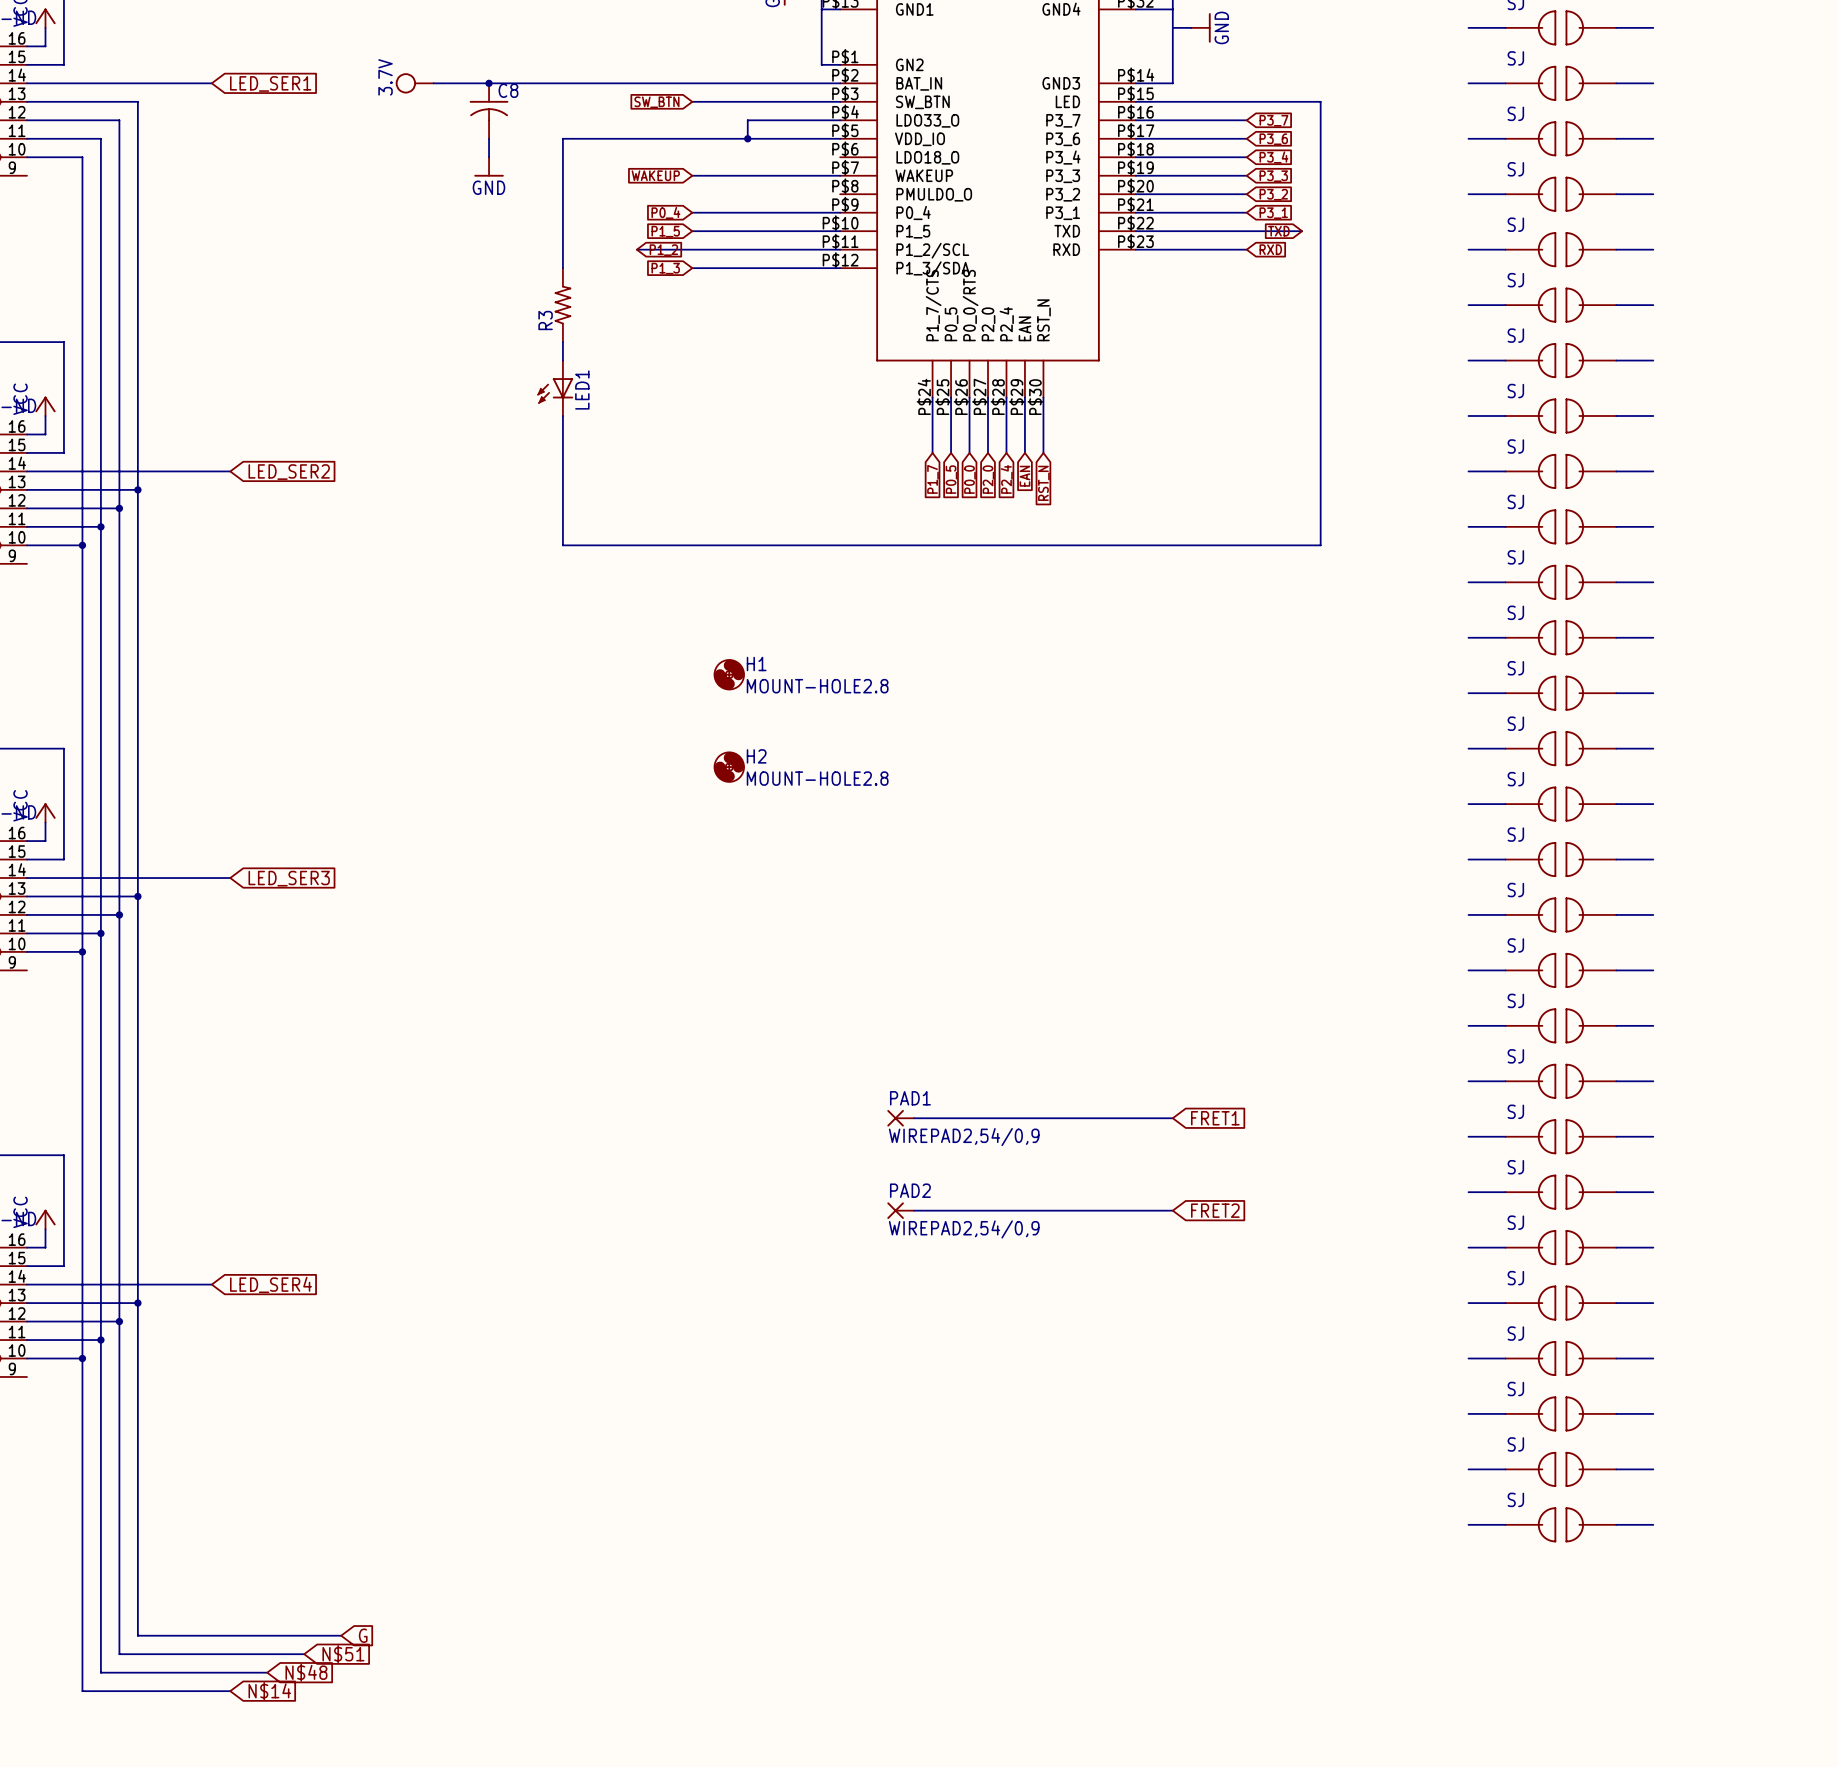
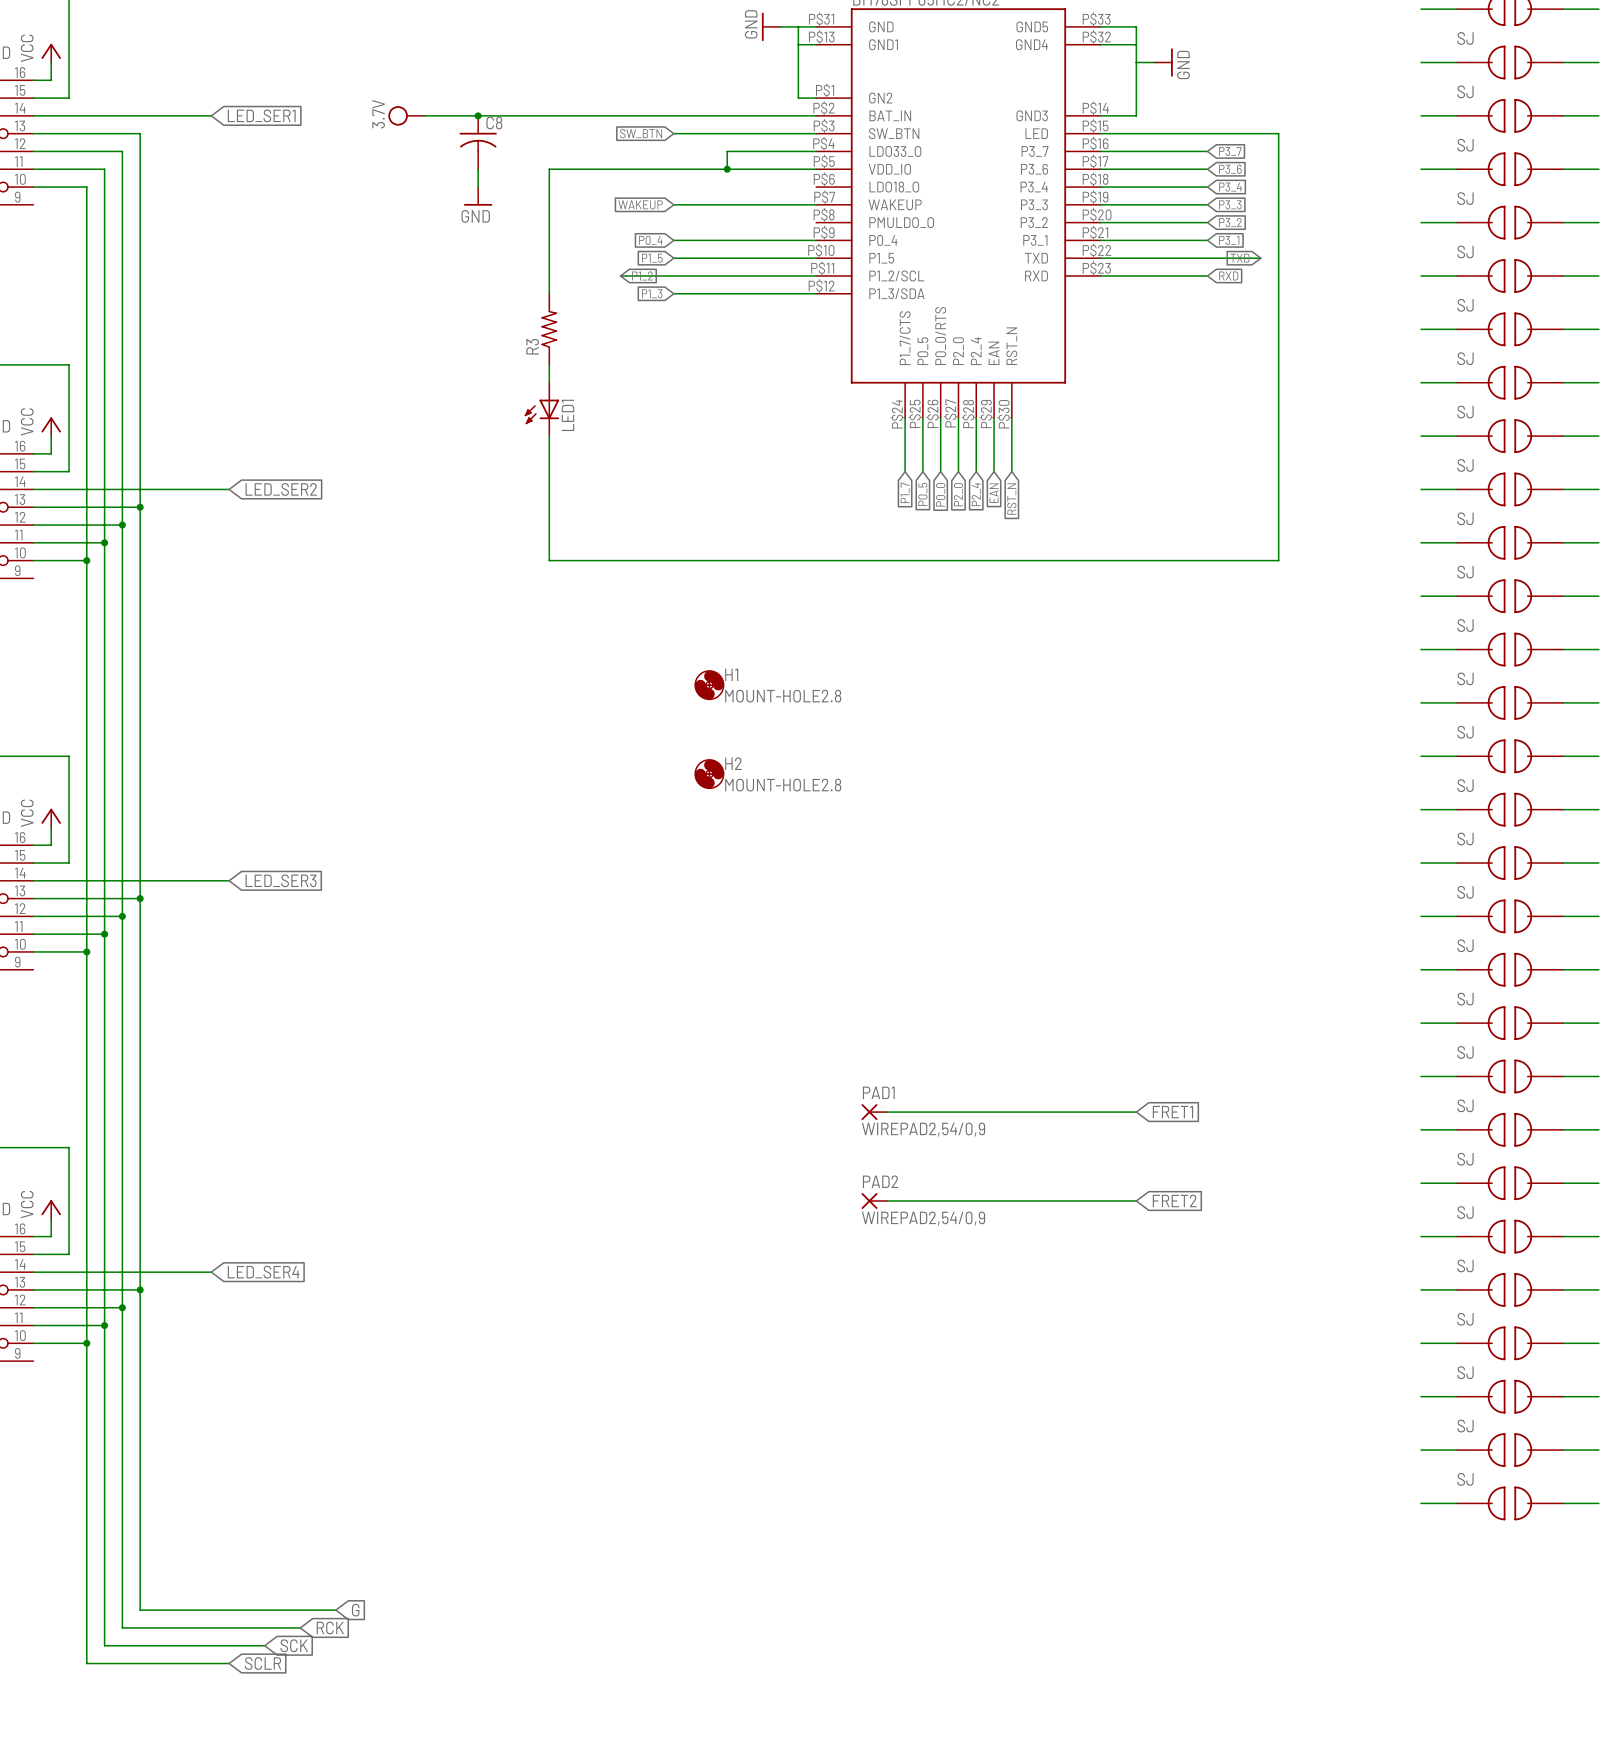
global label: N$51 (343, 1654) -> RCK (330, 1627)
global label: N$48 (306, 1672) -> SCK (294, 1645)
global label: N$14 (269, 1691) -> SCLR (263, 1663)

